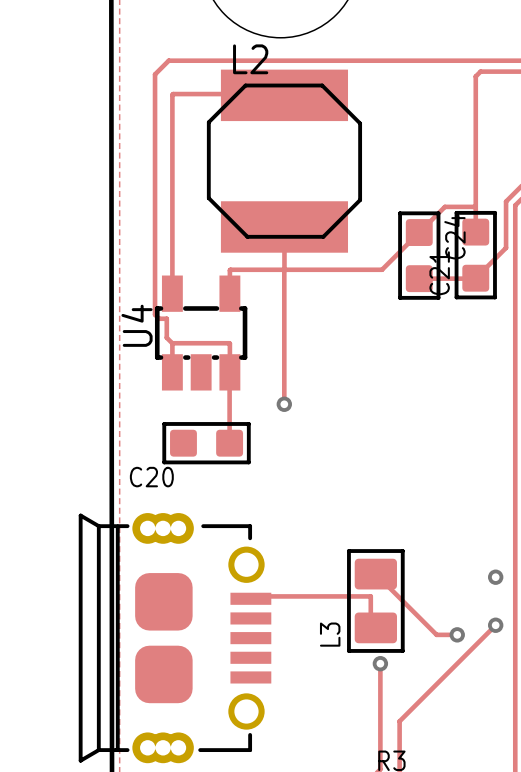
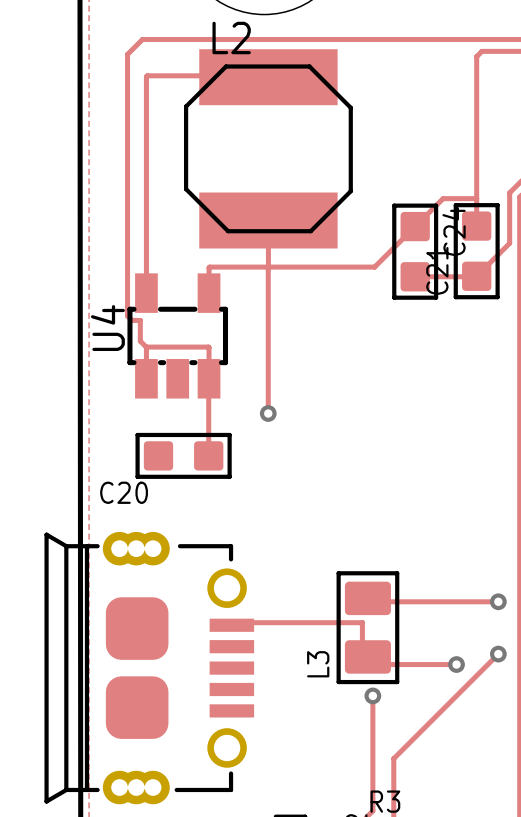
track: (375, 574) (436, 634) -> (372, 664) (434, 664)
track: none -> (372, 601) (498, 601)

